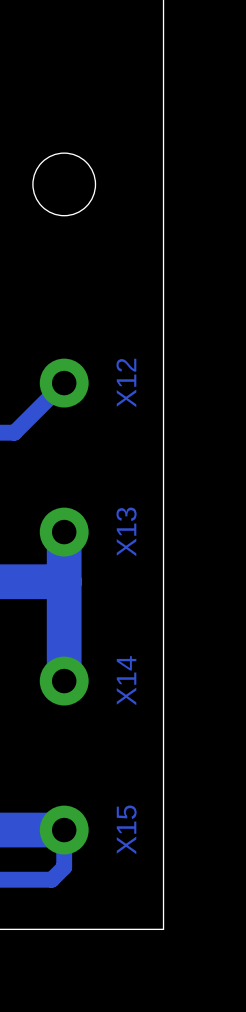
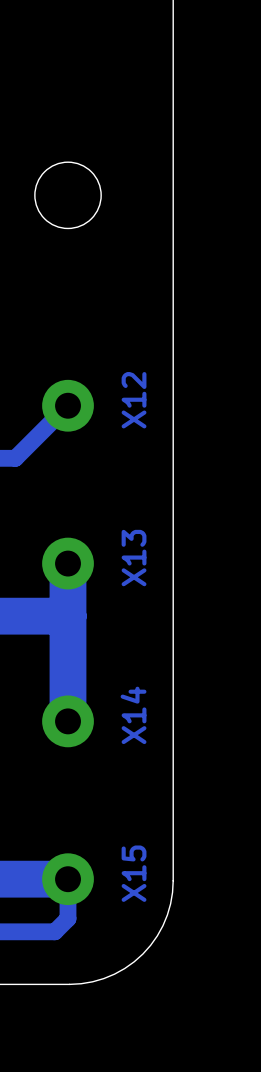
board edge: (163, 831) (163, 929) (65, 929) -> (173, 880) (167, 915) (157, 935) (142, 954) (124, 968) (103, 978) (69, 984)

